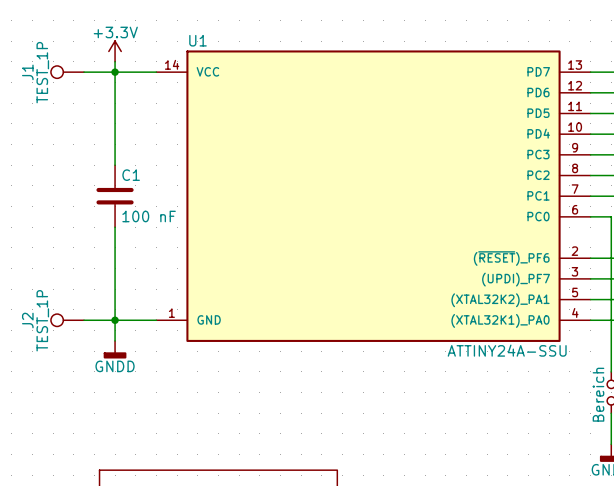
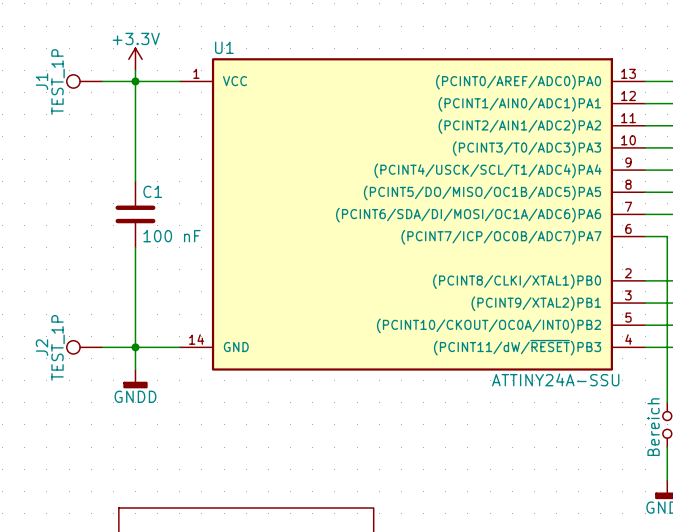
U1 symbol: [156, 50, 591, 342] -> [179, 58, 646, 371]

